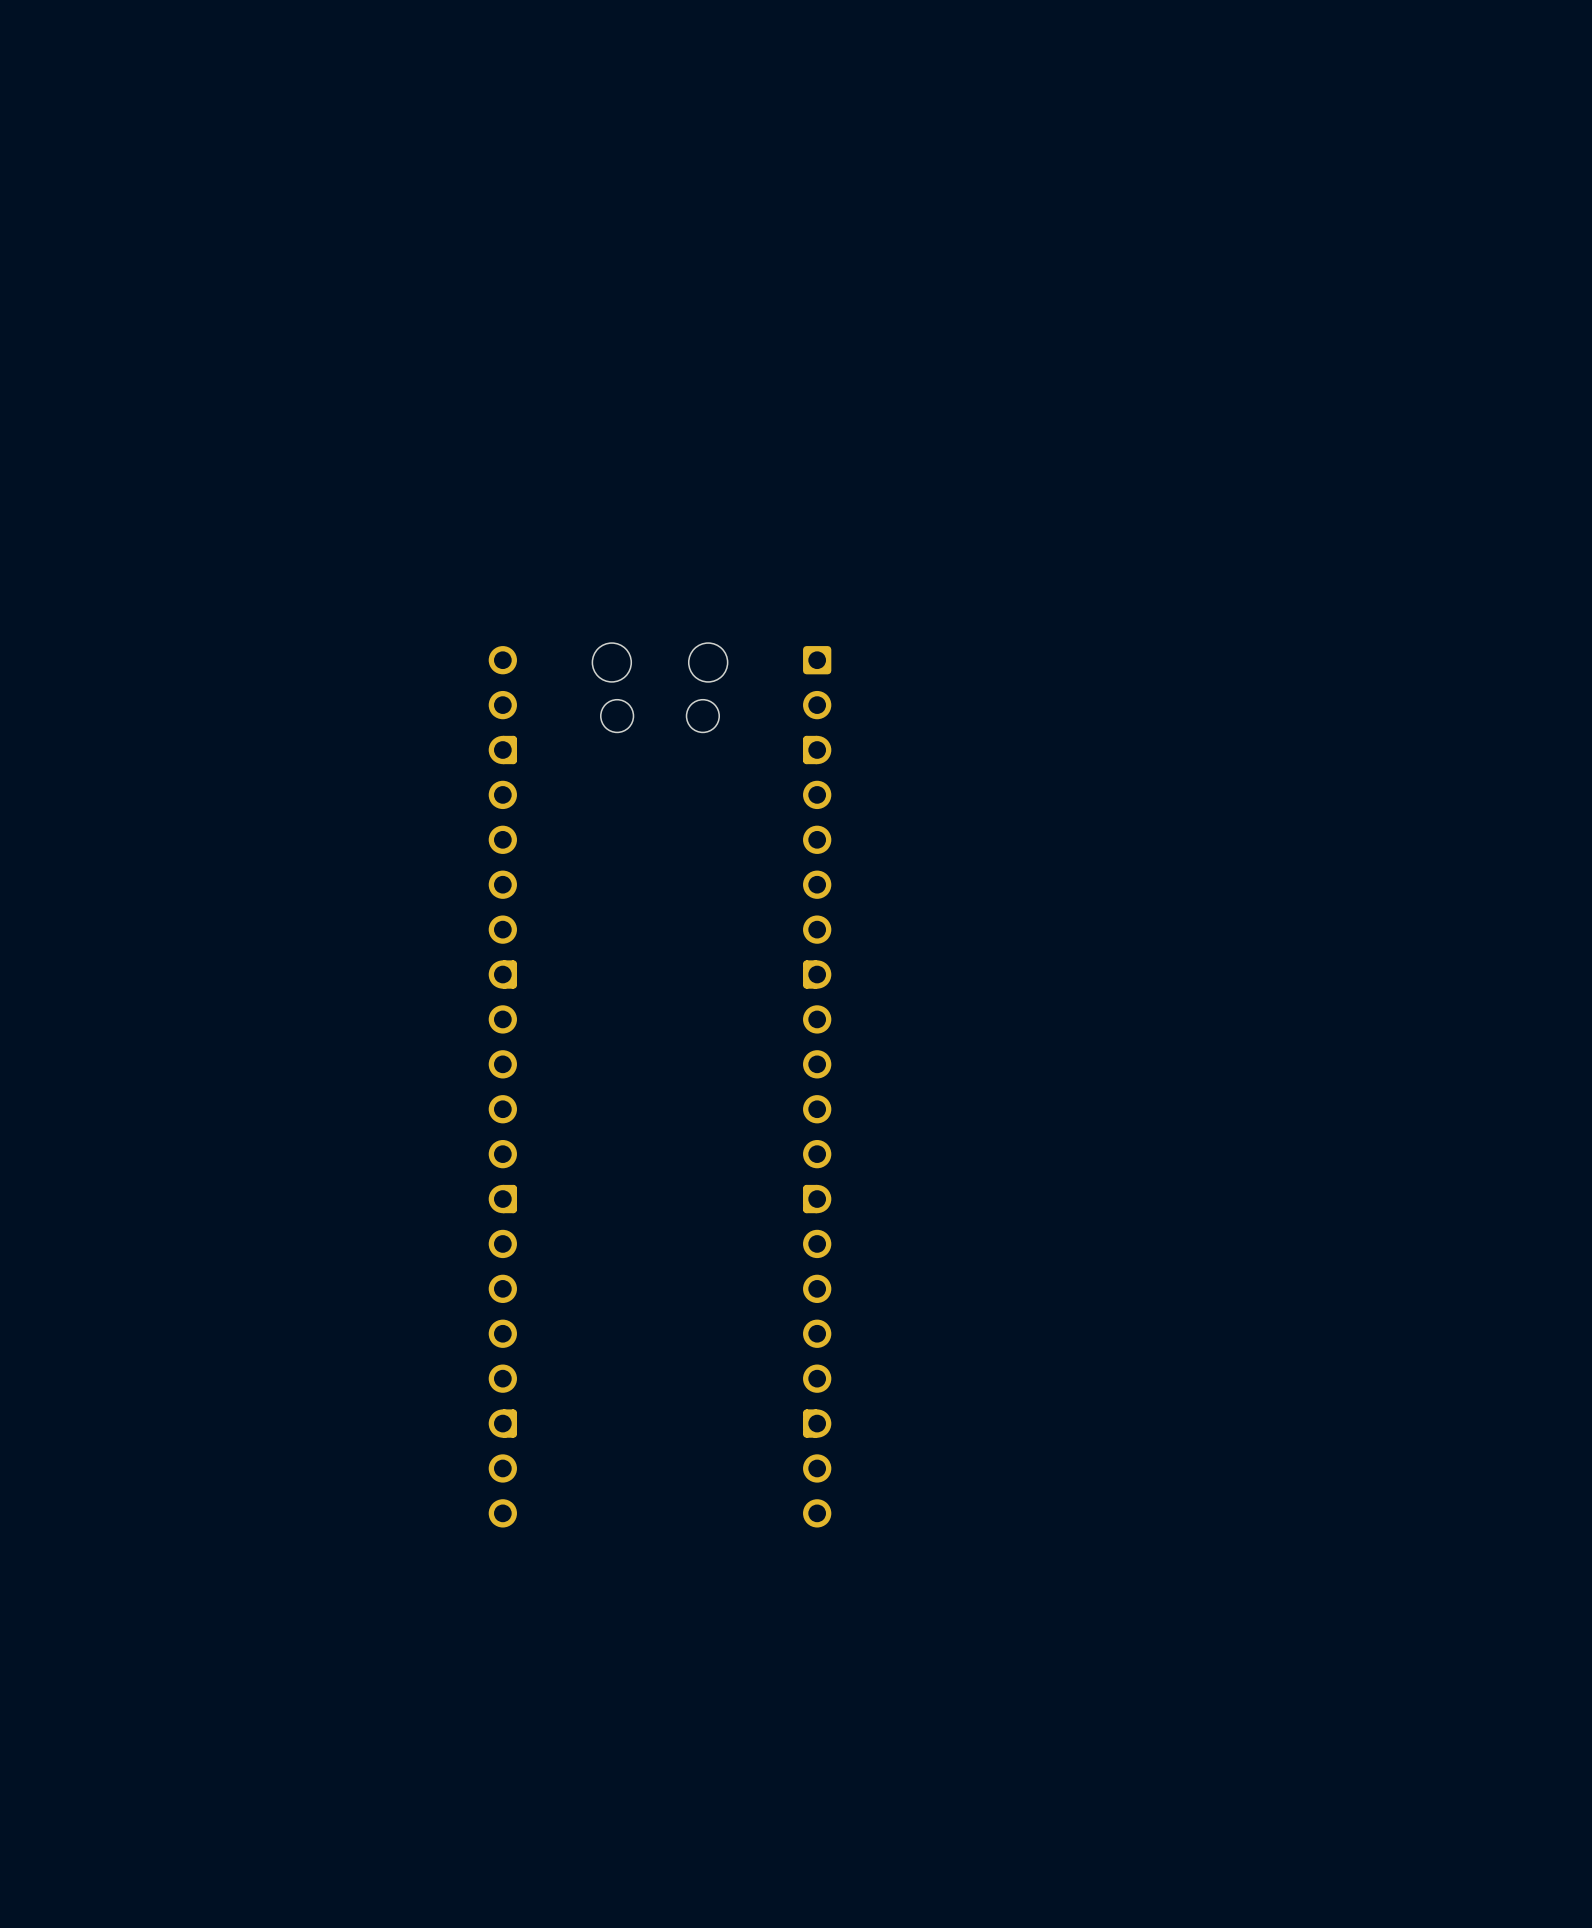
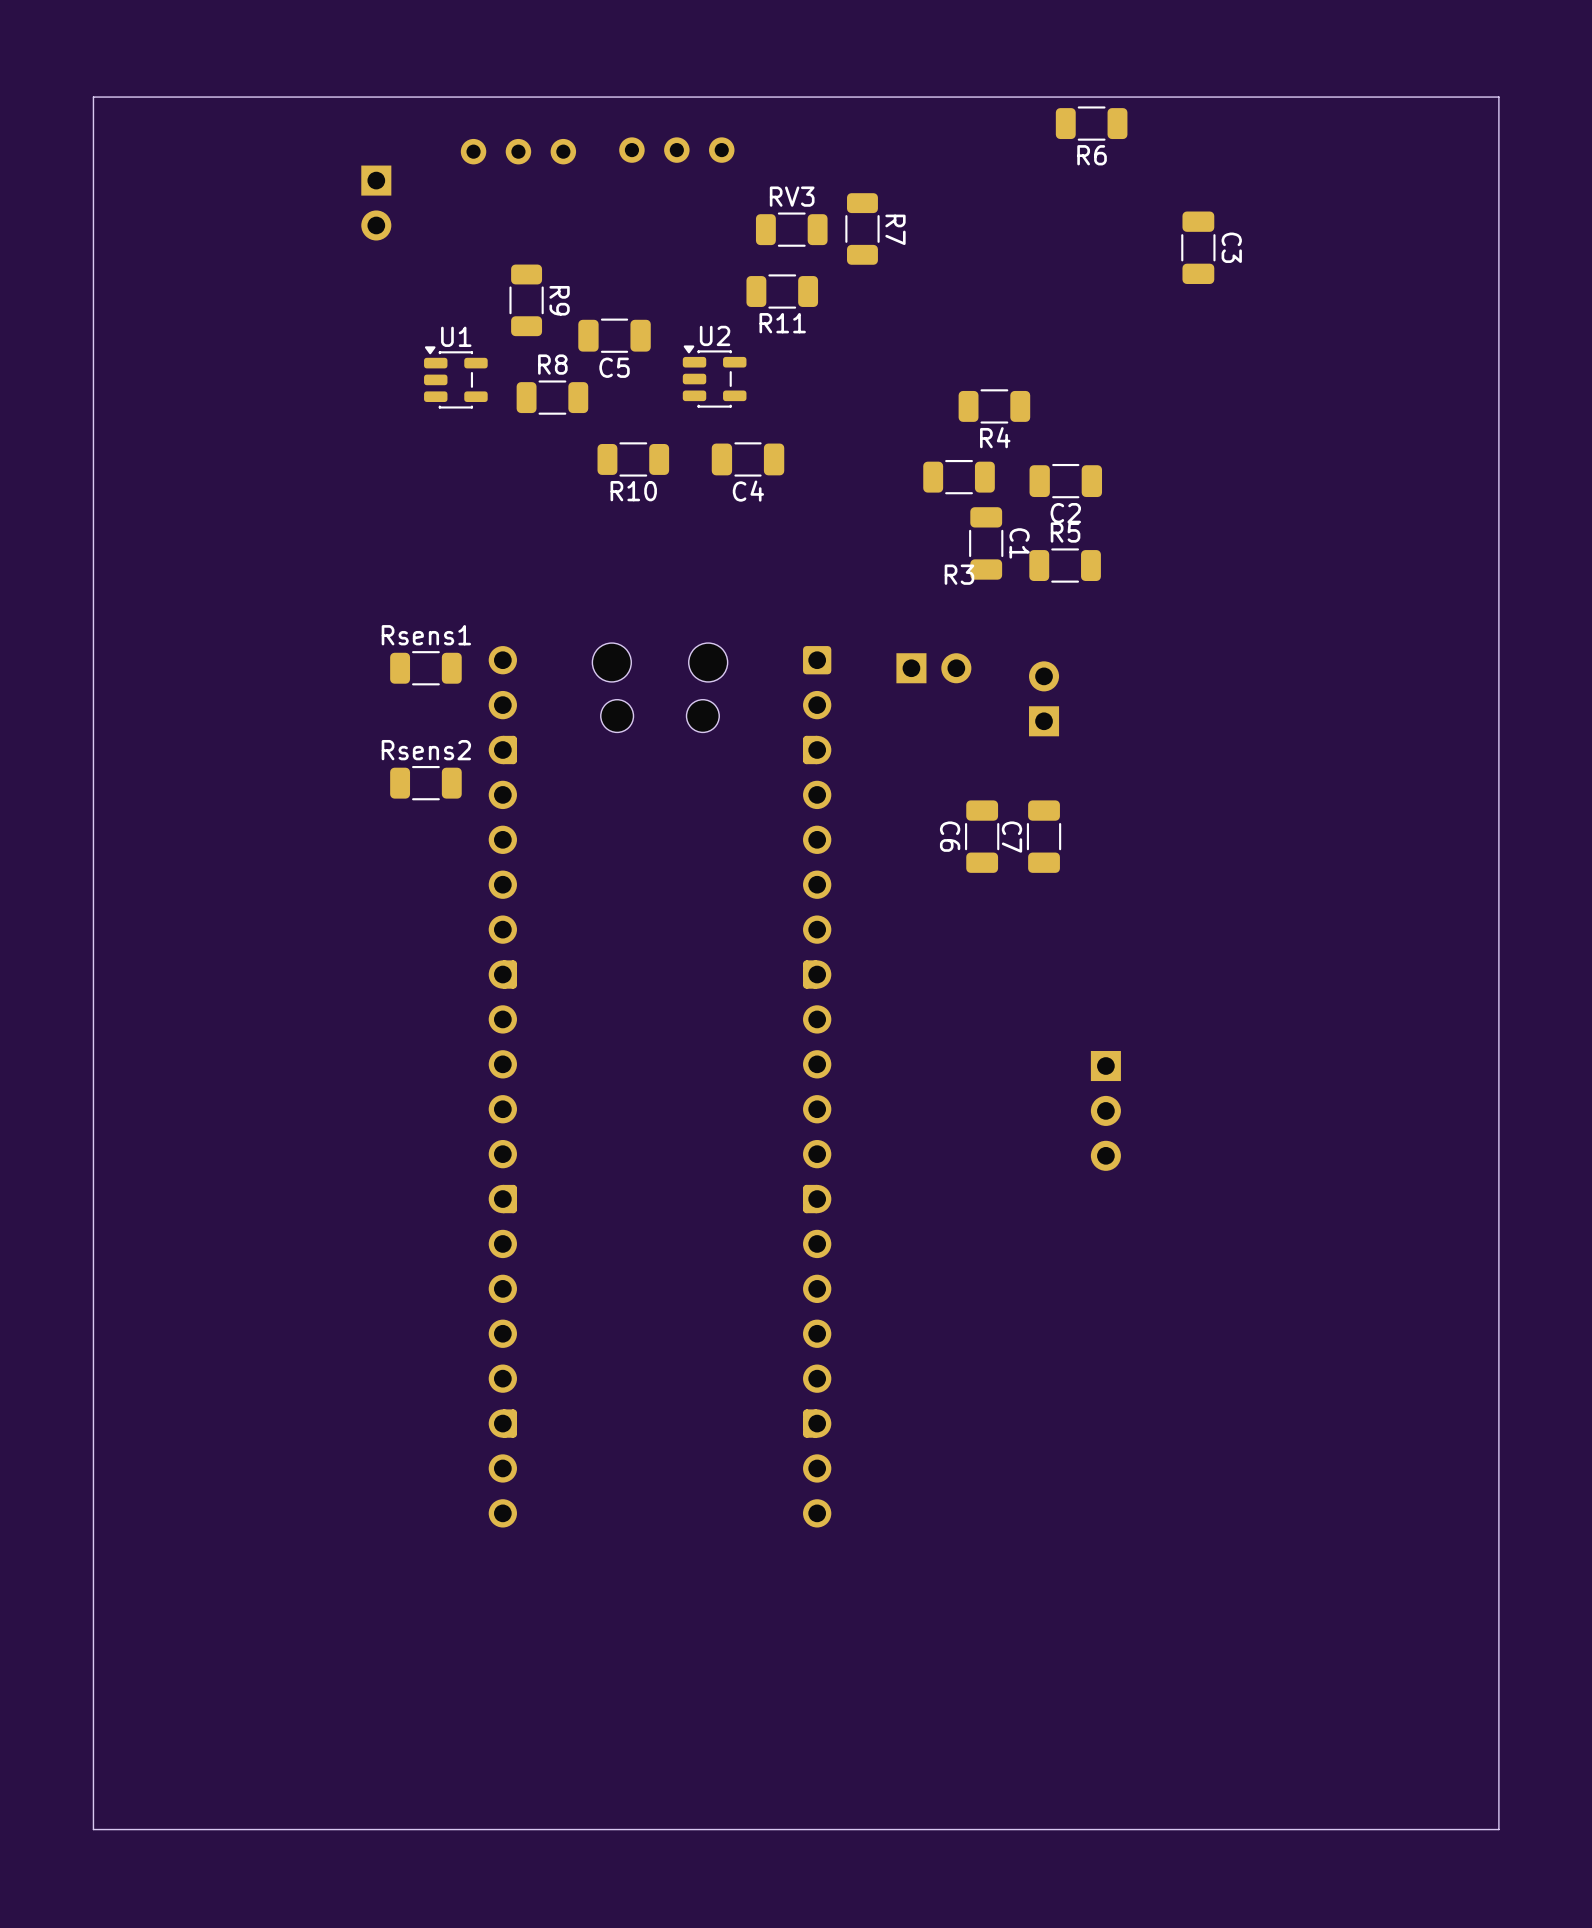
board edge: none -> (1498, 97) (93, 97) (93, 1829) (1498, 1829) (1498, 97)
R6: none -> (1091, 123)
part: none -> (676, 150)
part: none -> (518, 151)
part: none -> (376, 203)
R7: none -> (862, 228)
RV3: none -> (791, 229)
C3: none -> (1198, 247)
R11: none -> (782, 291)
R9: none -> (526, 300)
C5: none -> (614, 335)
U2: none -> (714, 376)
U1: none -> (455, 377)
R8: none -> (552, 397)
R4: none -> (994, 406)
R10: none -> (633, 459)
C4: none -> (748, 459)
R3: none -> (959, 477)
C2: none -> (1065, 481)
C1: none -> (986, 543)
R5: none -> (1065, 565)
Rsens1: none -> (425, 668)
part: none -> (933, 668)
part: none -> (1044, 698)
Rsens2: none -> (425, 783)
C6: none -> (982, 836)
C7: none -> (1044, 836)
part: none -> (1105, 1110)

